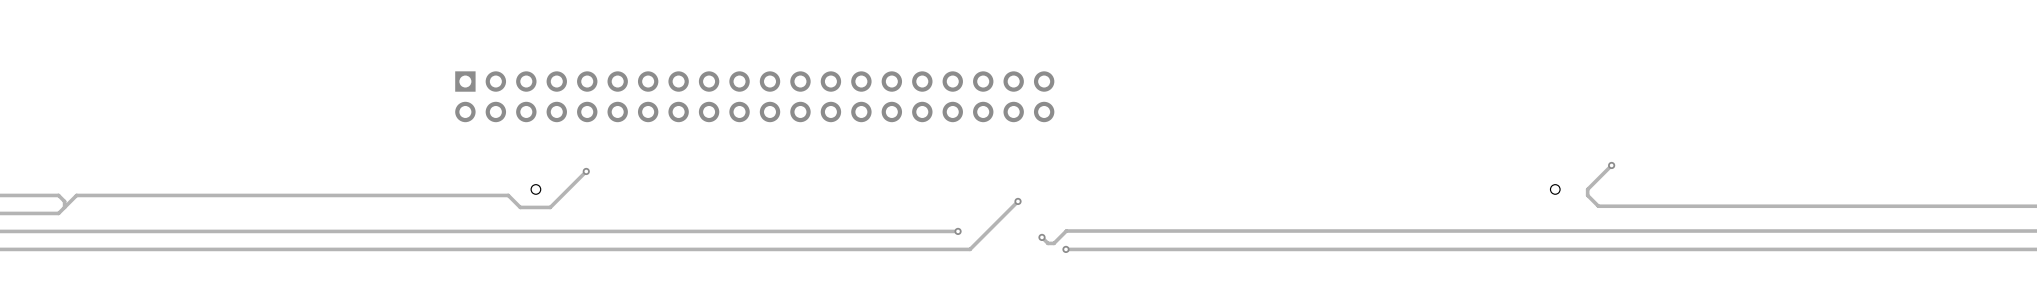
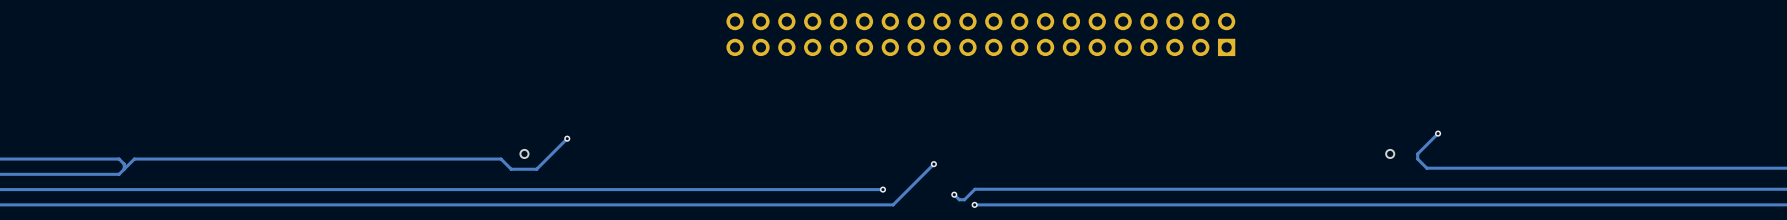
part: none -> (980, 34)
part: (754, 96) -> none

